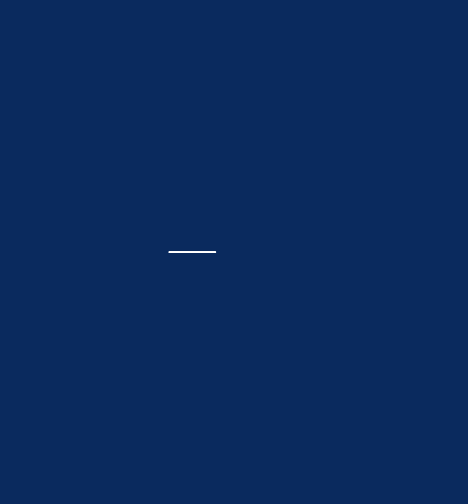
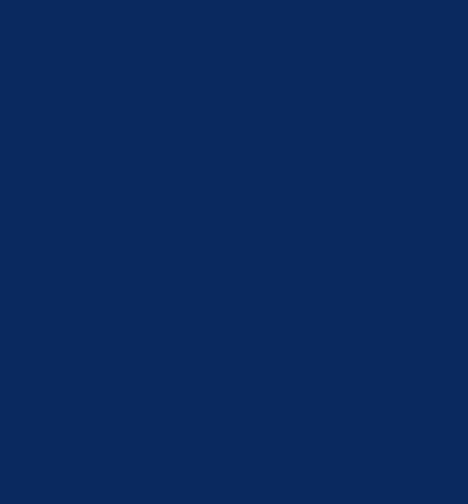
line: (215, 252) (169, 252) -> none

